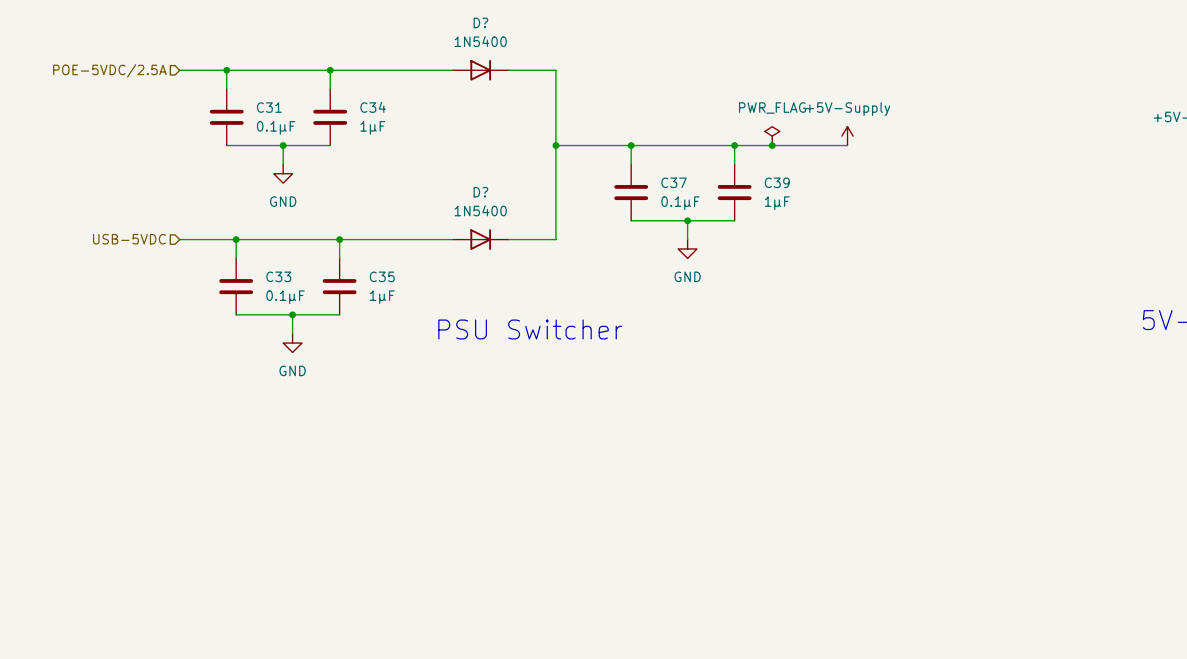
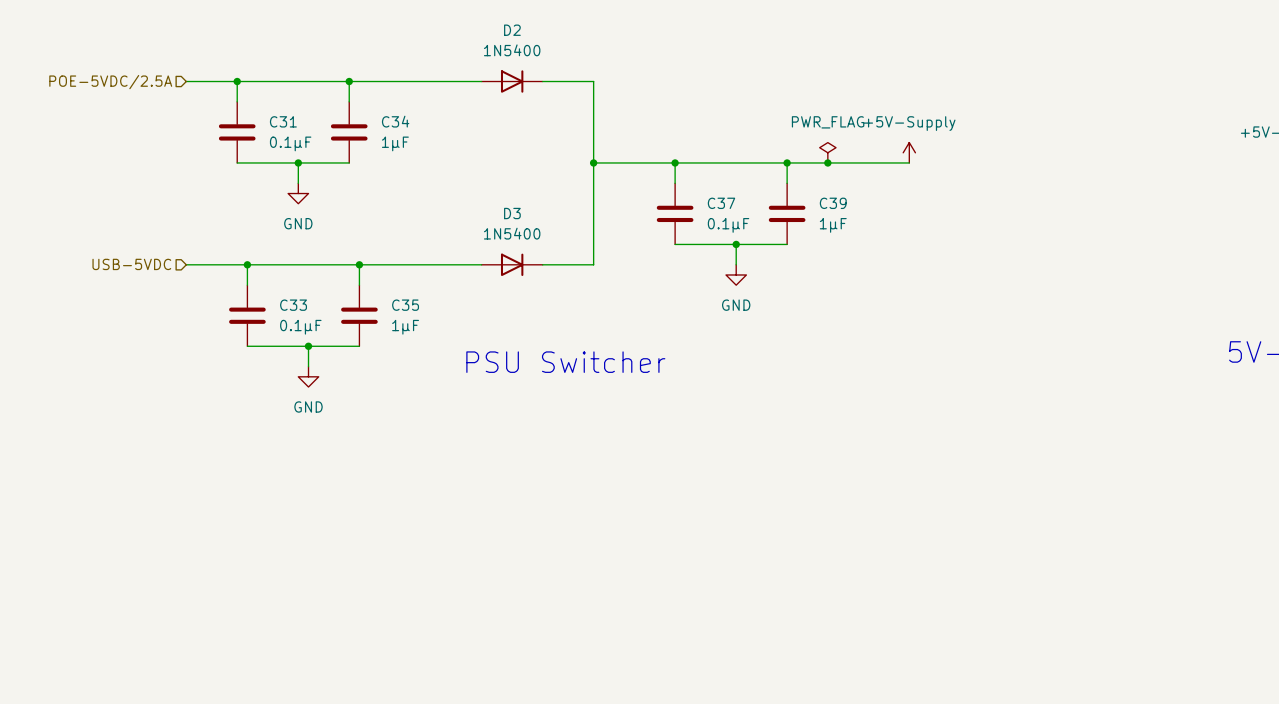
D? name: D? (480, 22) -> D2 (512, 30)
D? name: D? (480, 192) -> D3 (512, 213)

